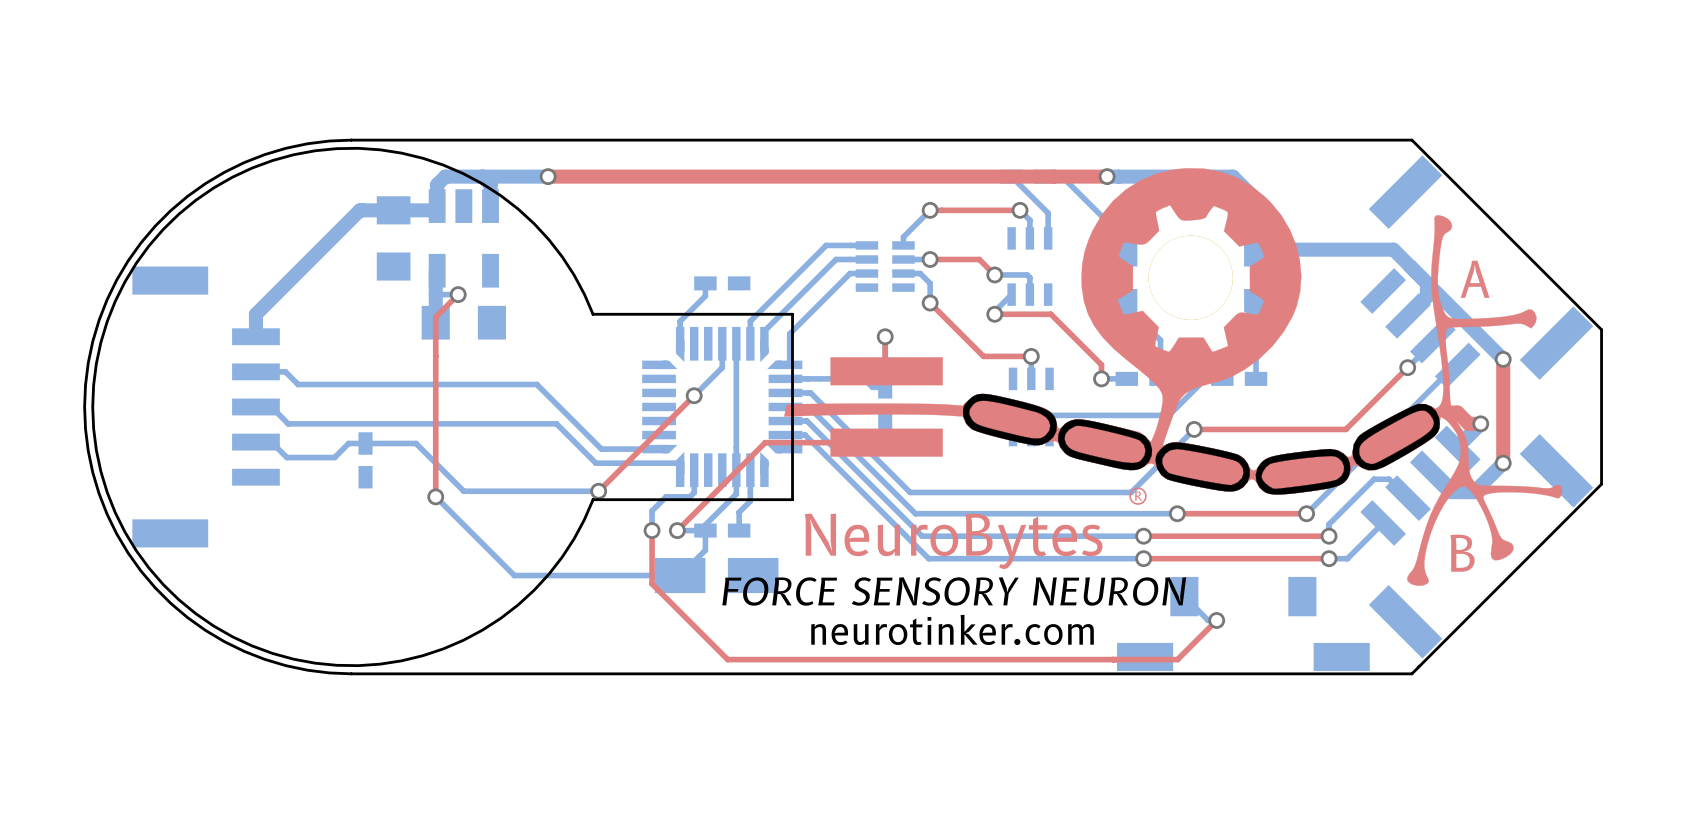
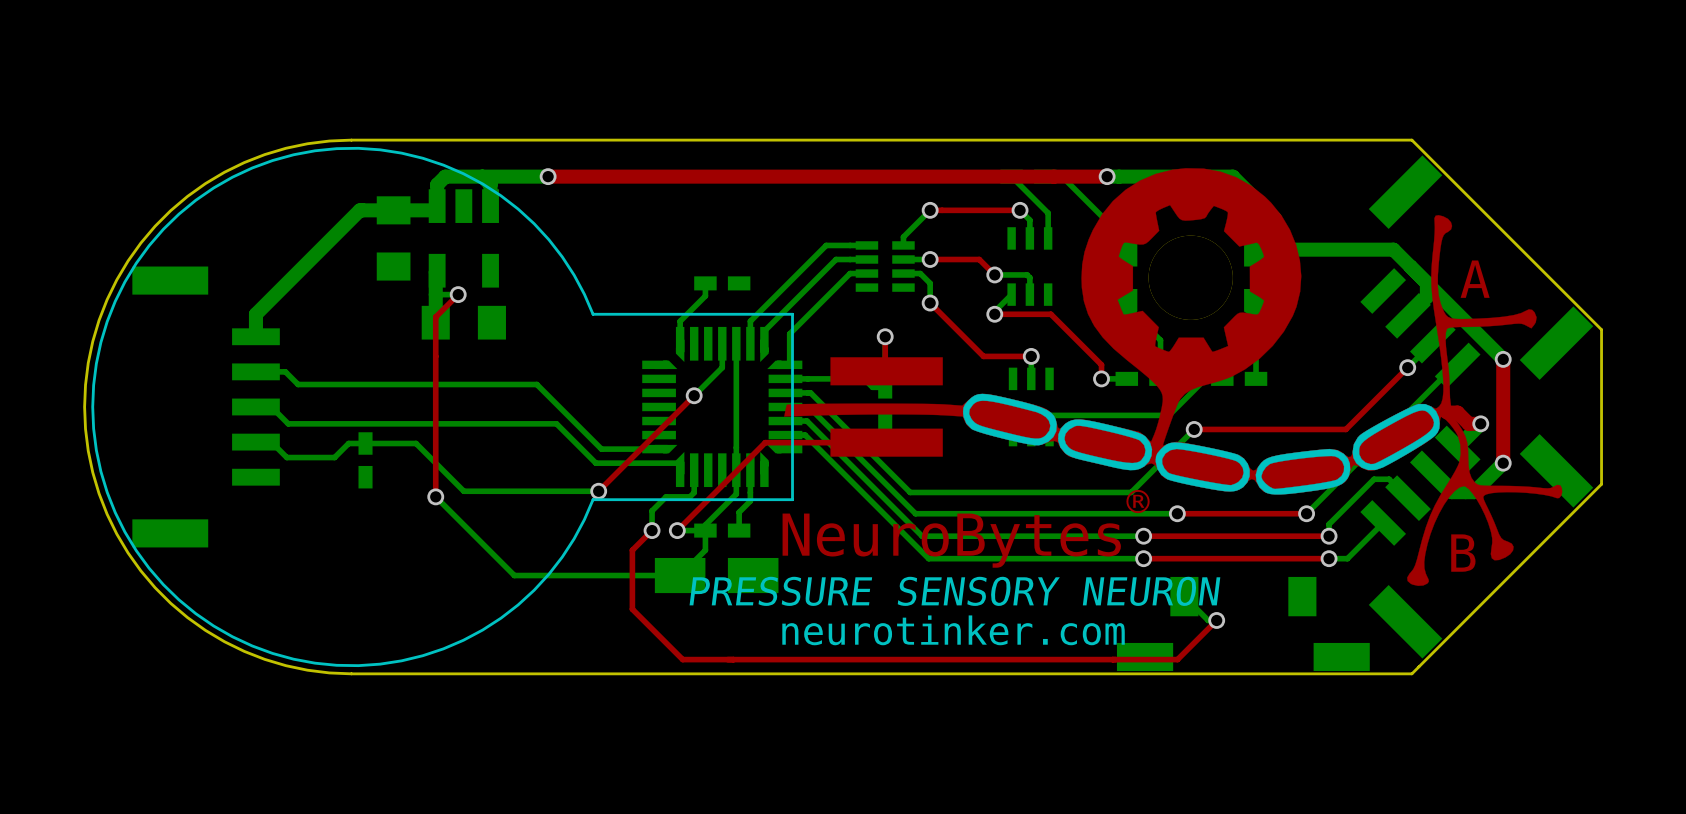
top track: (652, 530) (652, 583) (727, 659) -> (652, 530) (632, 550) (632, 609) (682, 659) (727, 659)
text: FORCE SENSORY NEURON (954, 591) -> PRESSURE SENSORY NEURON (954, 591)

